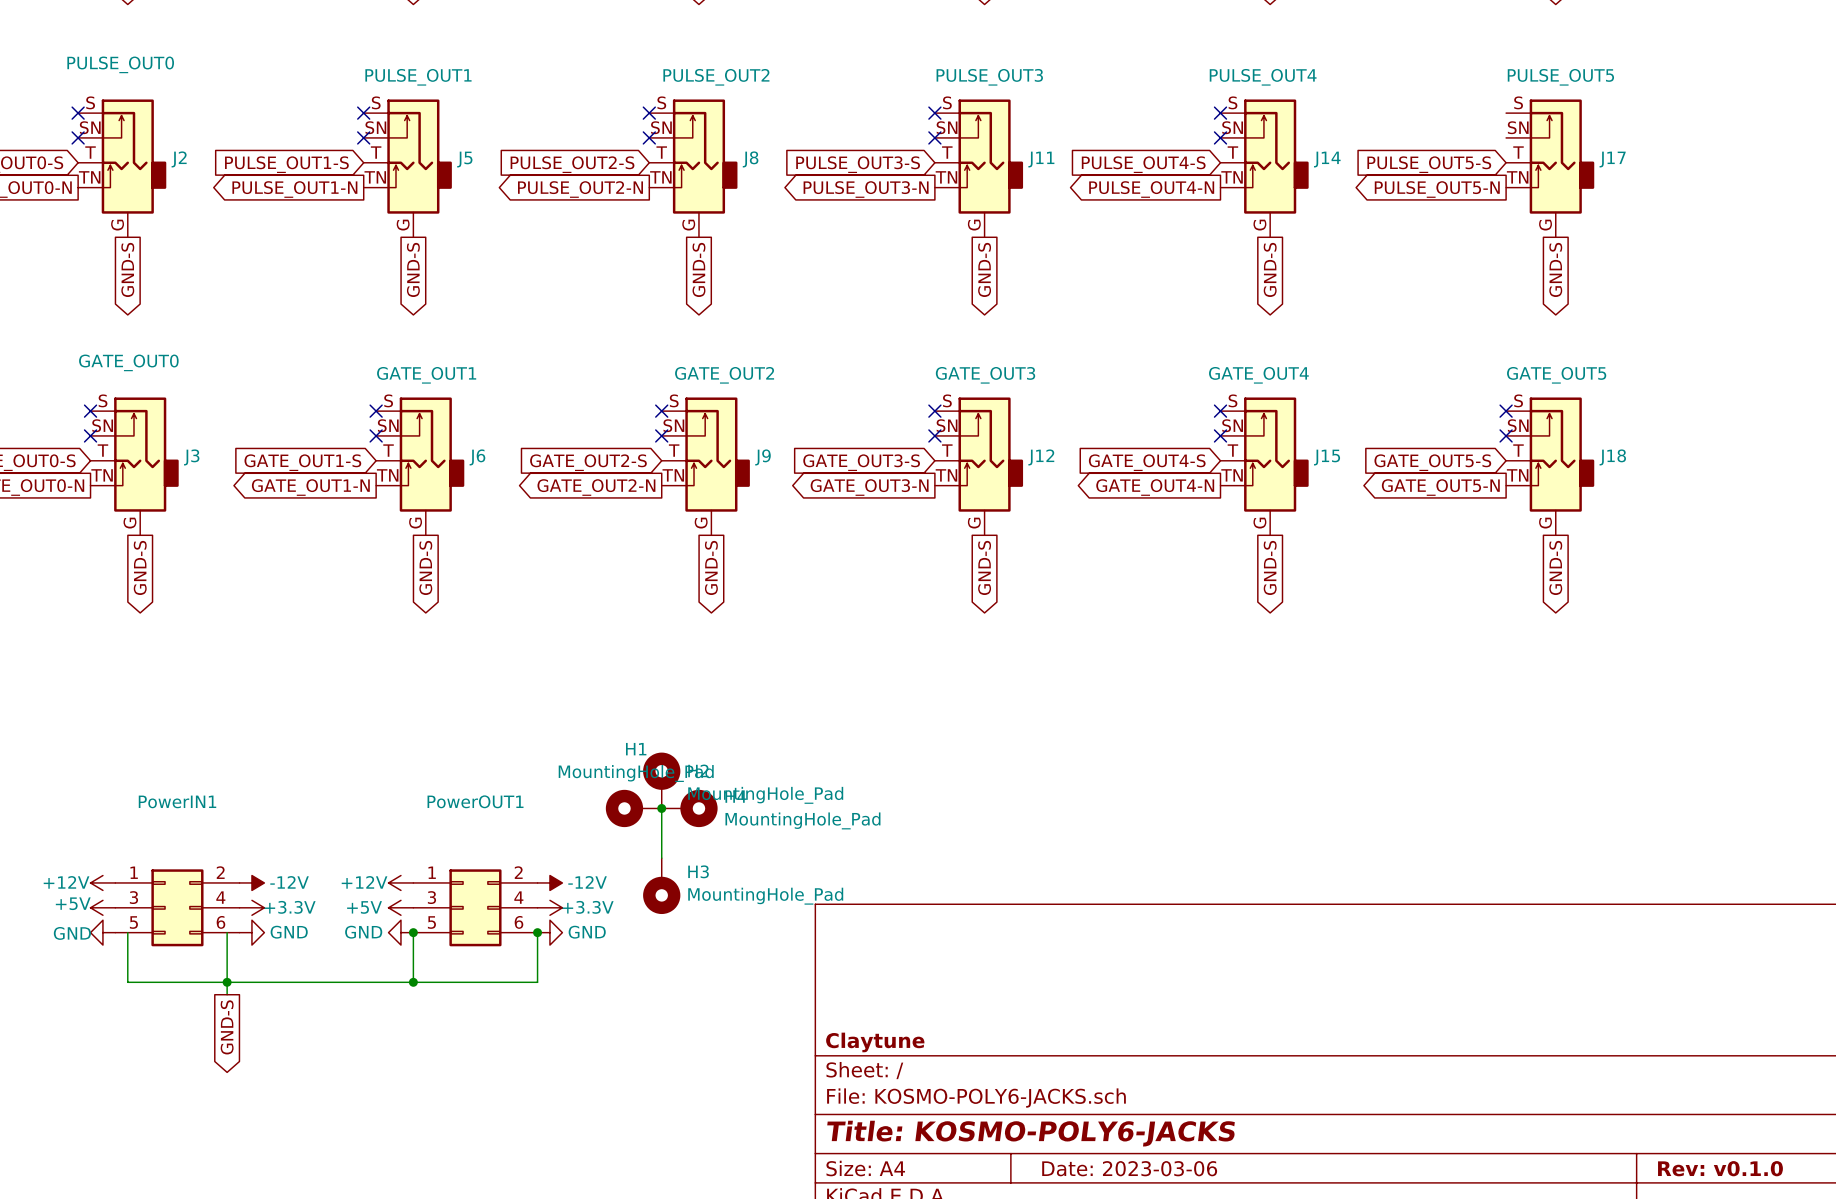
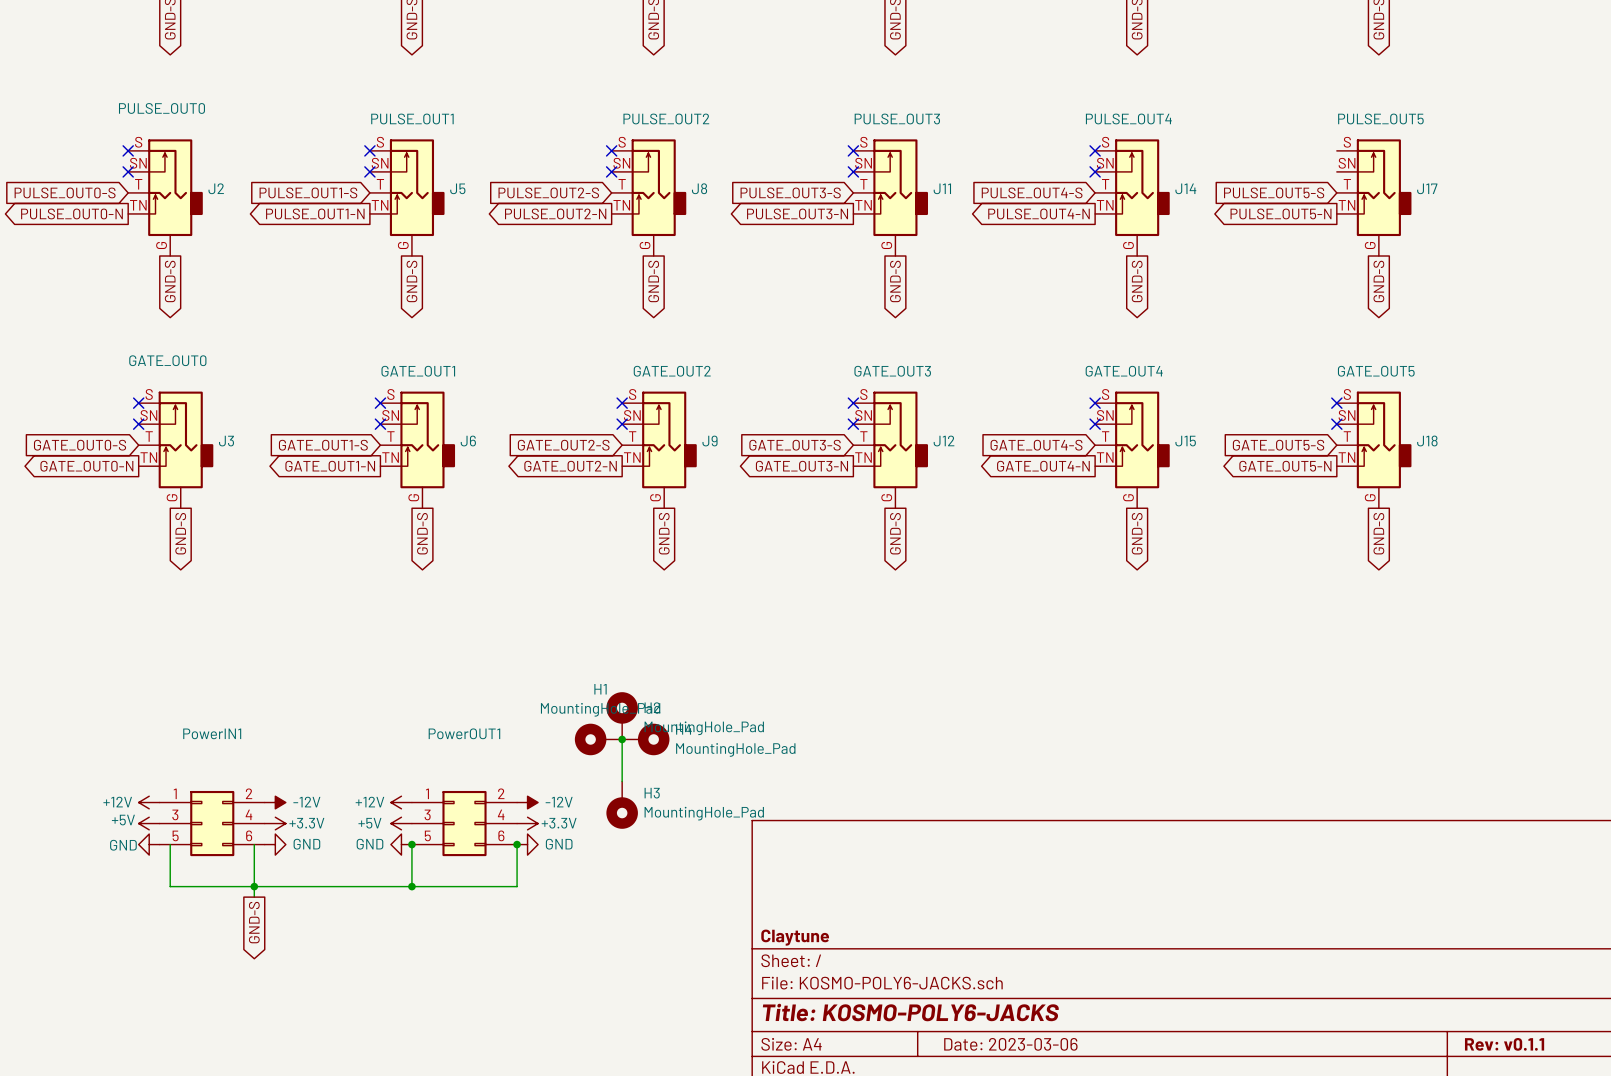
title block: Rev: v0.1.0 (1720, 1168) -> Rev: v0.1.1 (1504, 1044)

